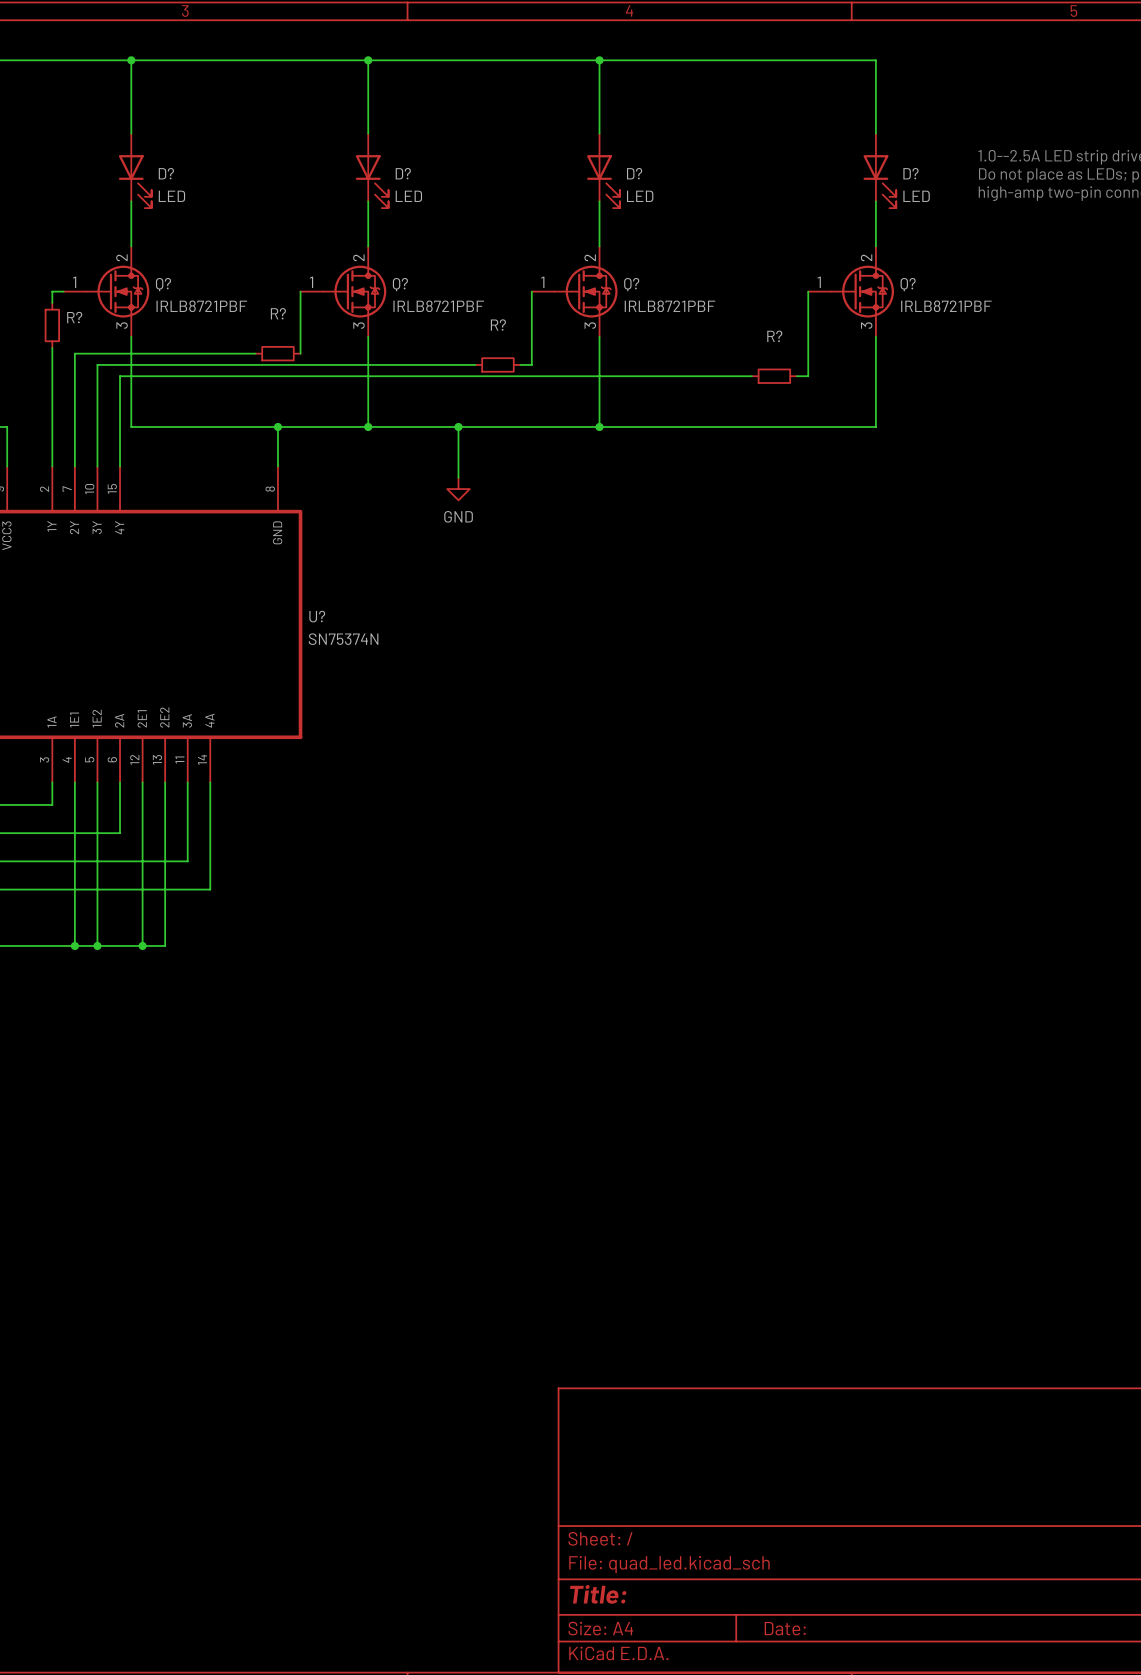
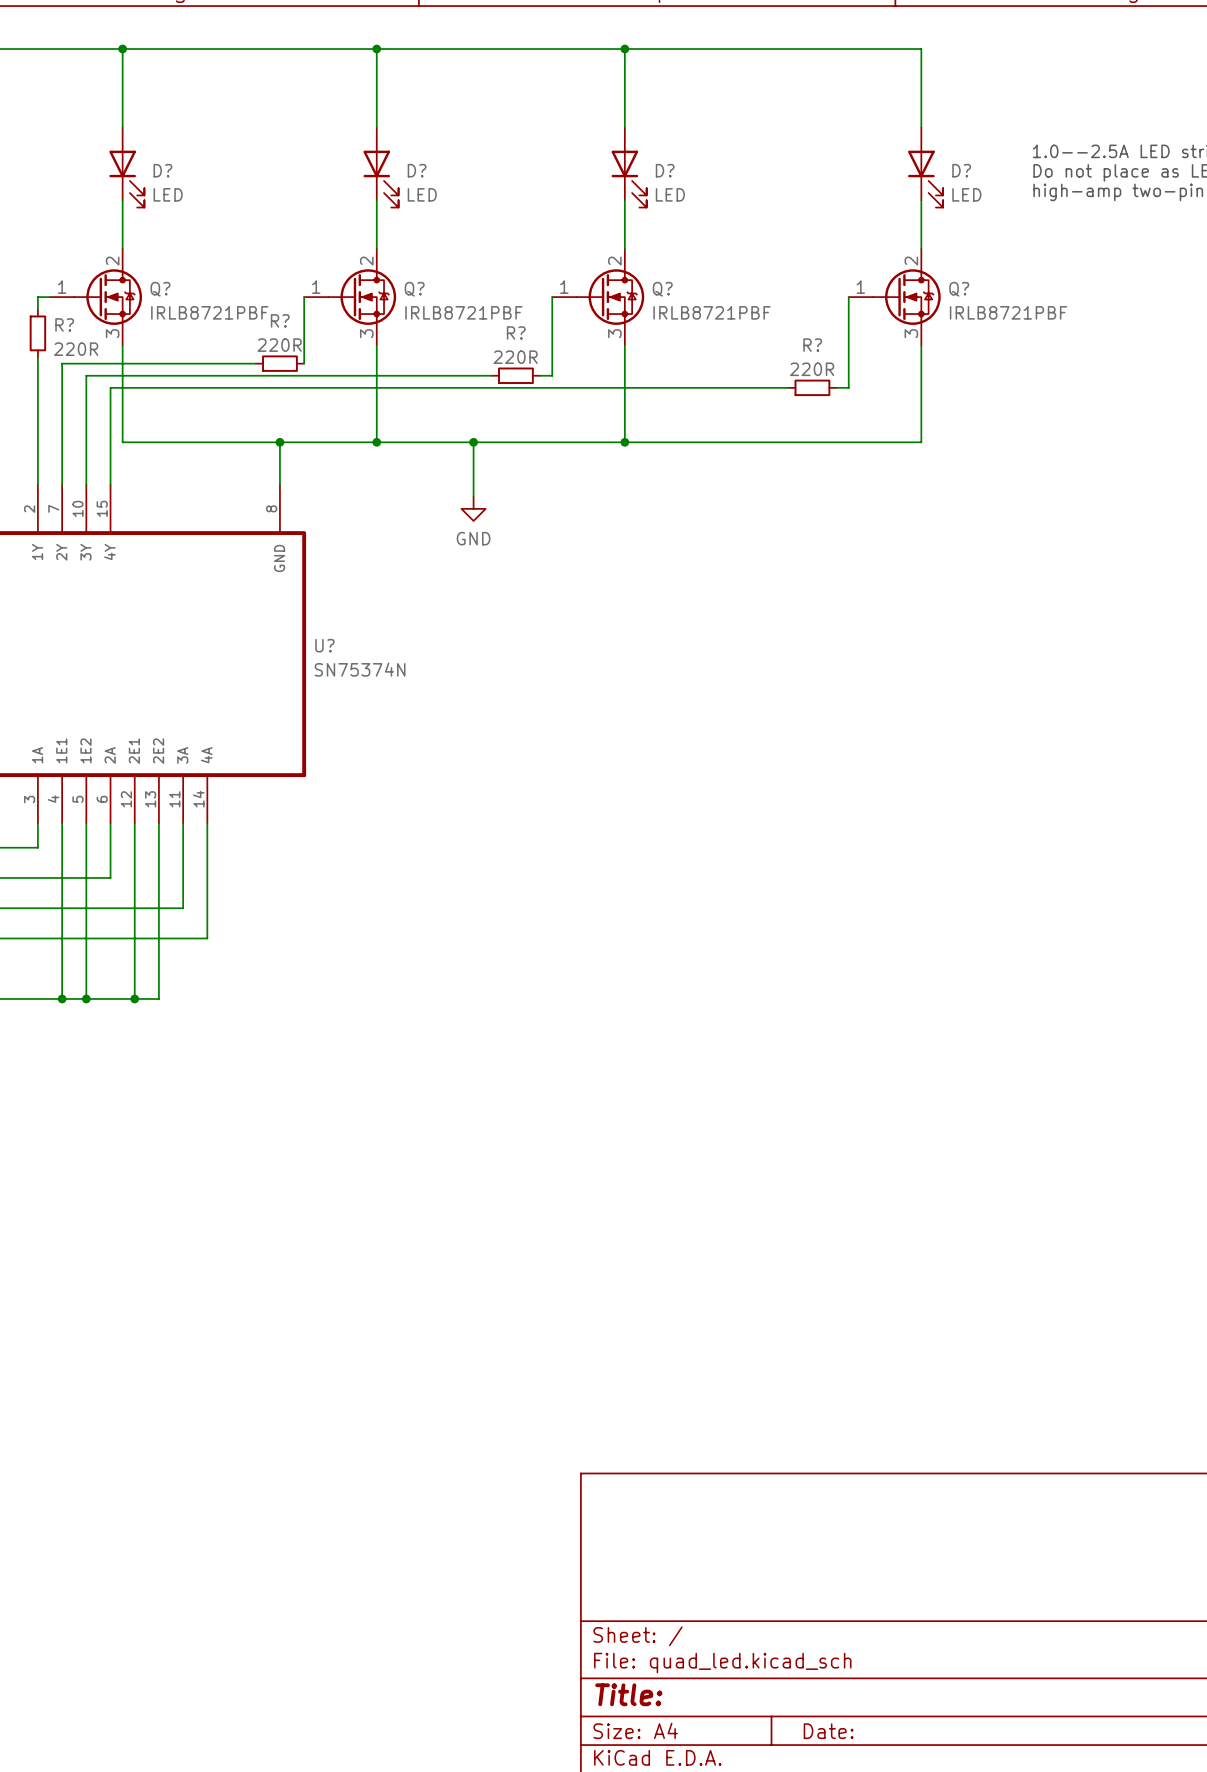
R? value: none -> 220R (279, 345)
R? value: none -> 220R (76, 349)
R? value: none -> 220R (515, 357)
R? value: none -> 220R (812, 369)

